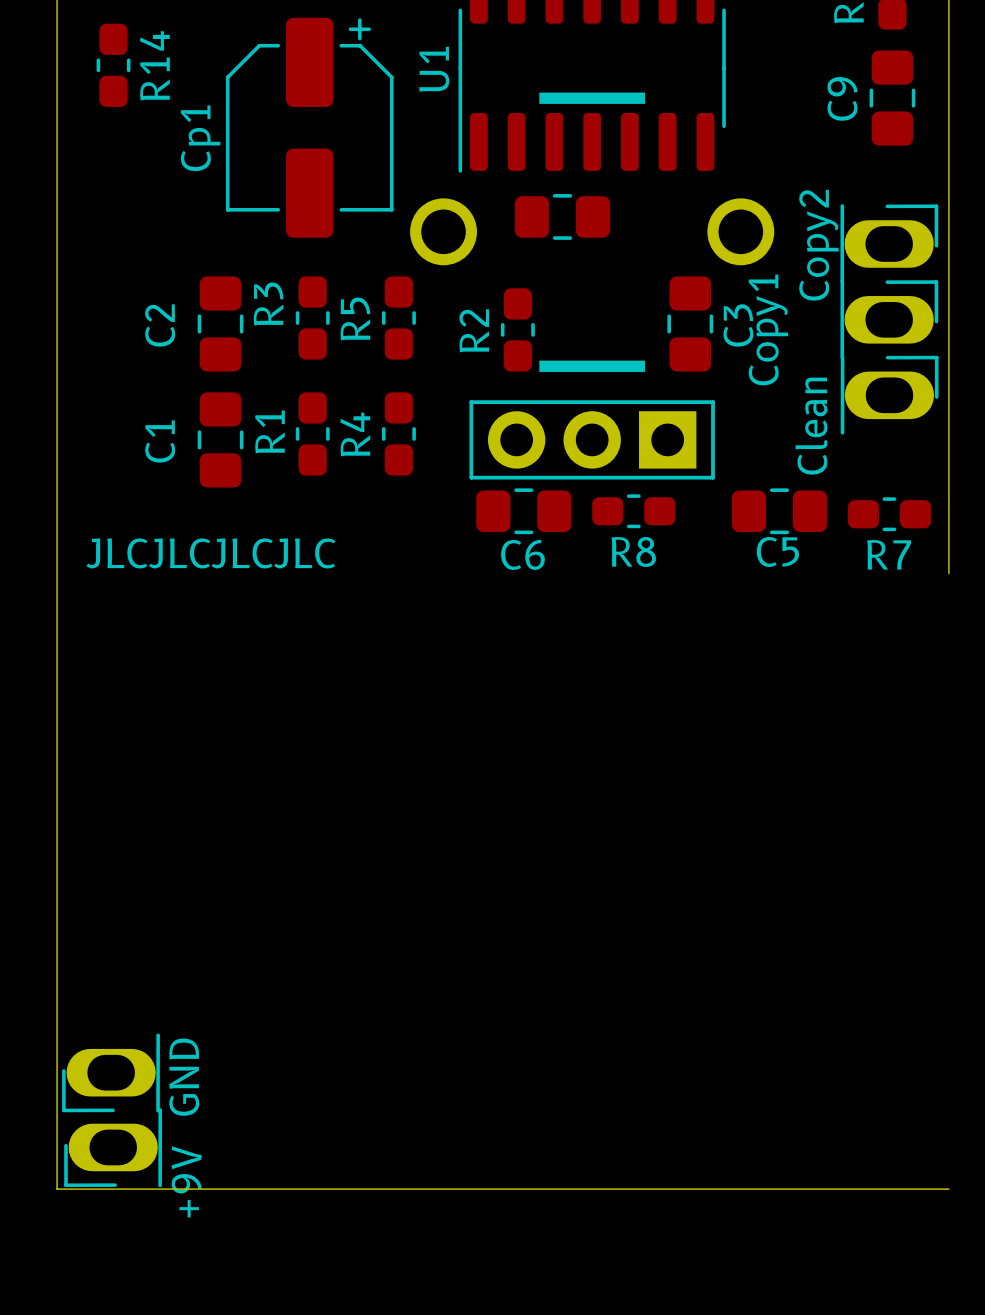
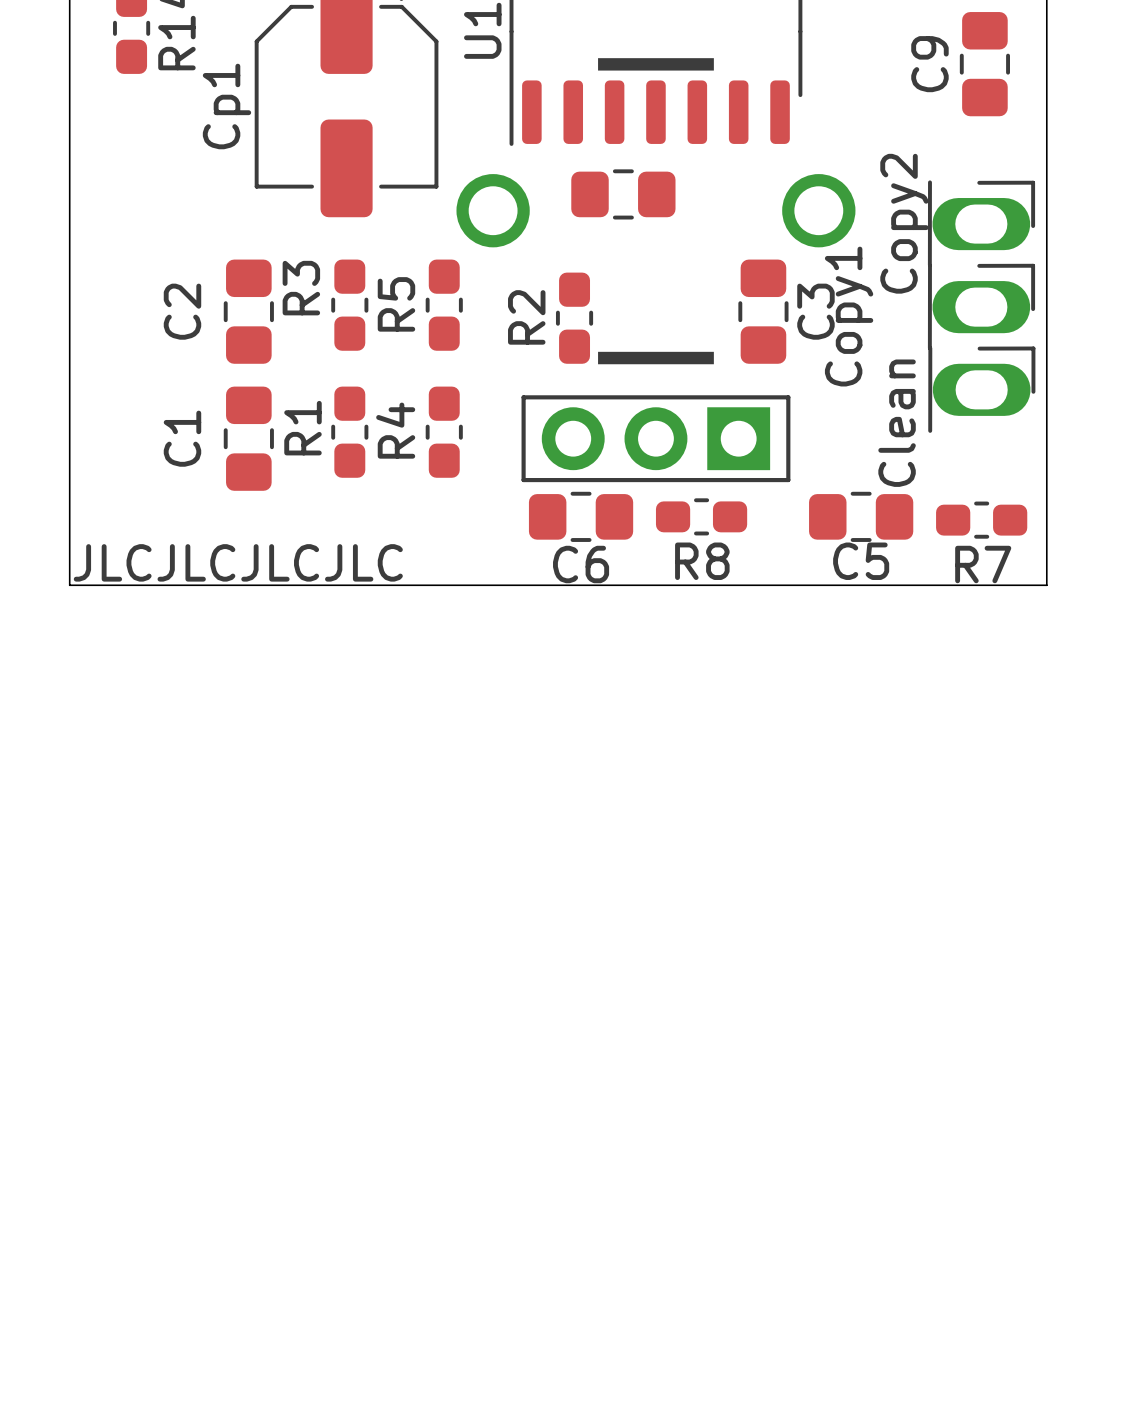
board edge: (57, 573) (57, 1189) (948, 1189) -> (69, 585) (1046, 585)
part: GND (111, 1073) -> none
part: +9V (113, 1147) -> none

